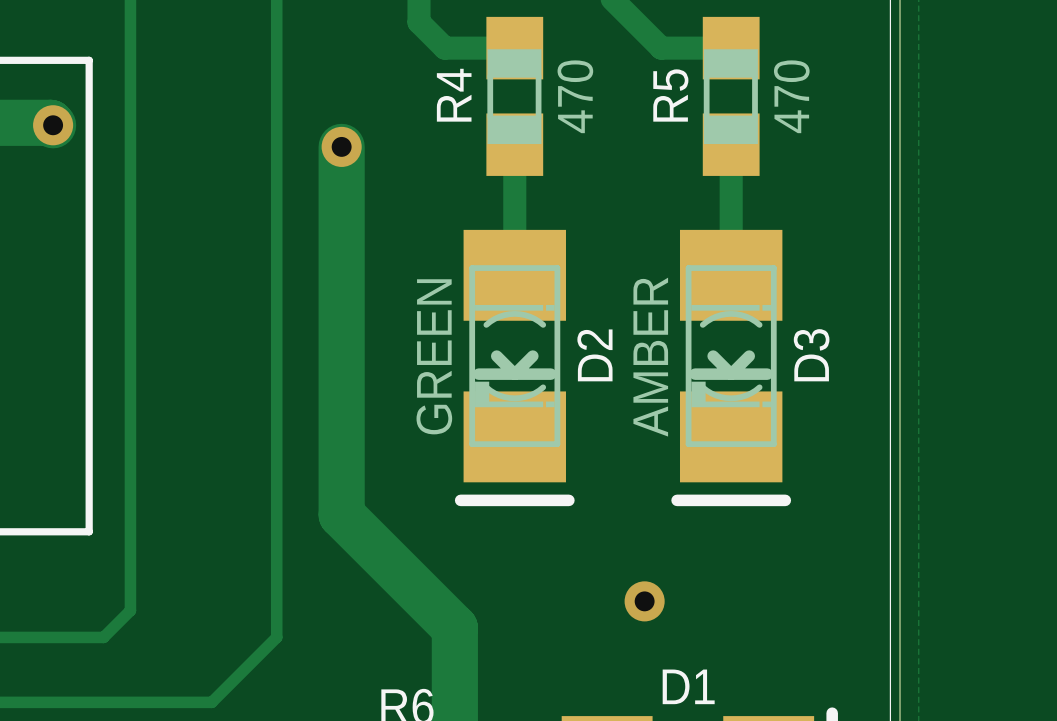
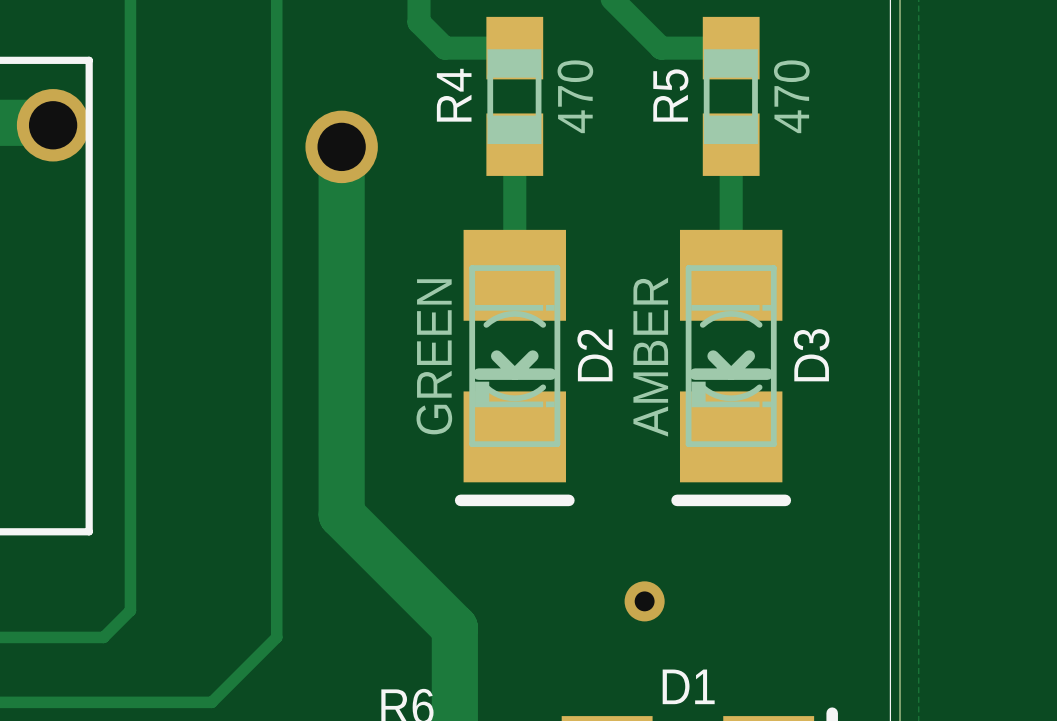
via size: [33, 105, 74, 146] -> [16, 89, 90, 162]
via size: [321, 126, 362, 167] -> [305, 110, 378, 184]

